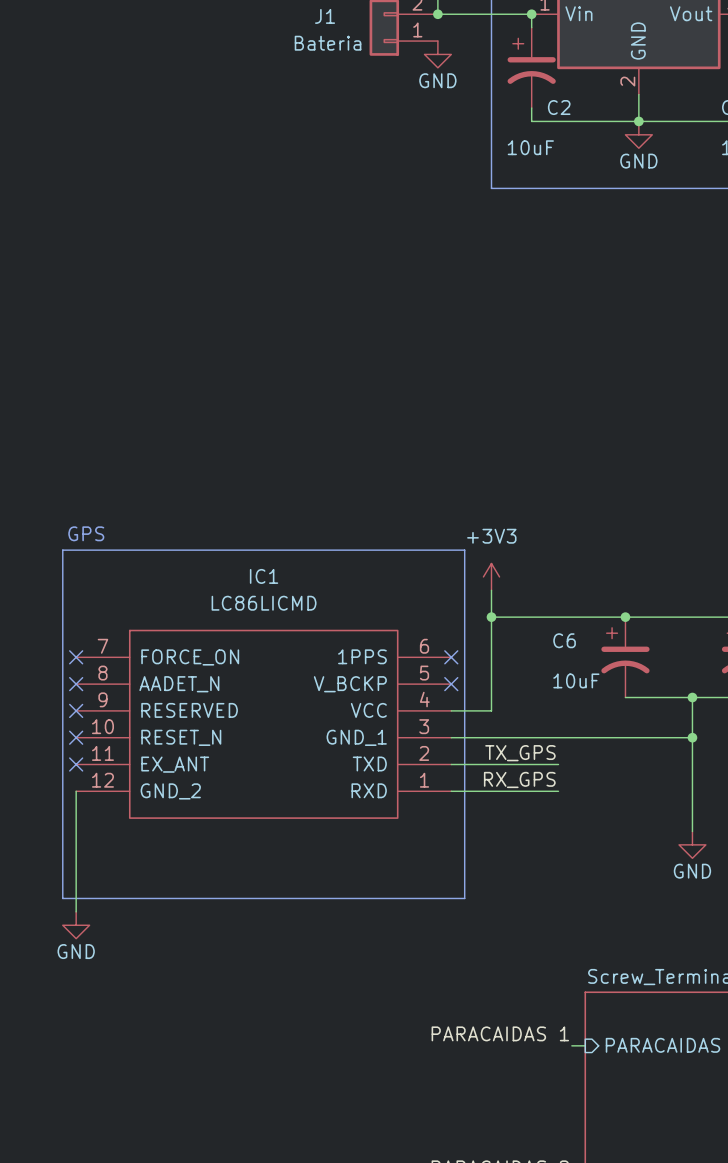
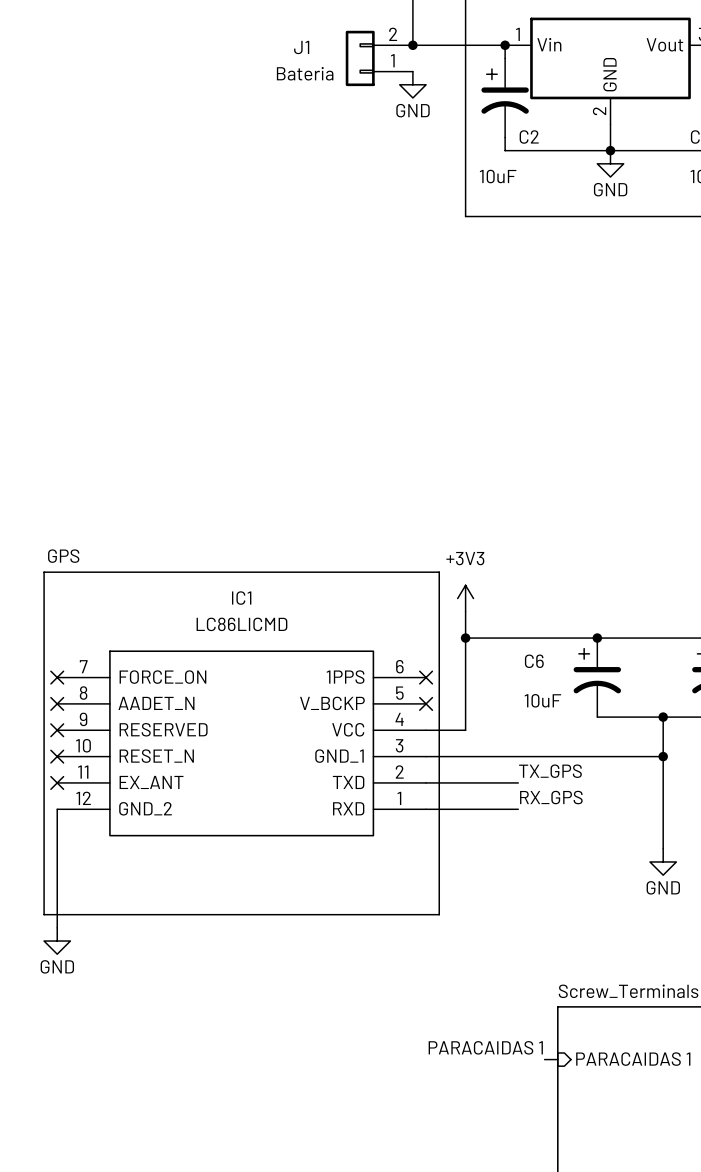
label position: TX_GPS (520, 753) -> TX_GPS (550, 771)
wire: (545, 764) (558, 764) -> none
label position: RX_GPS (519, 779) -> RX_GPS (551, 797)
wire: (545, 791) (558, 791) -> none

